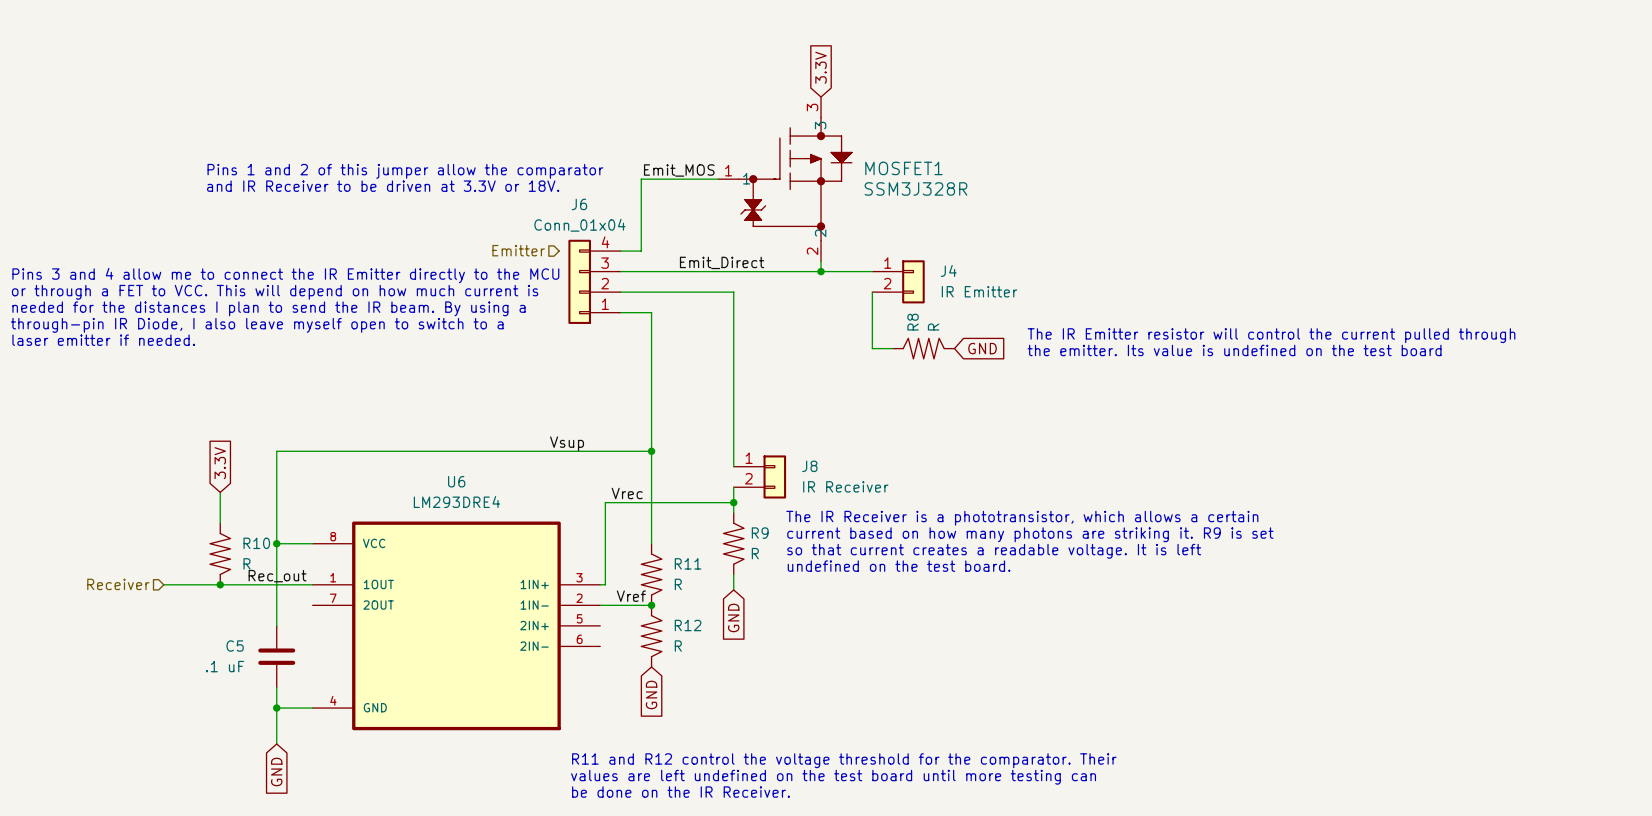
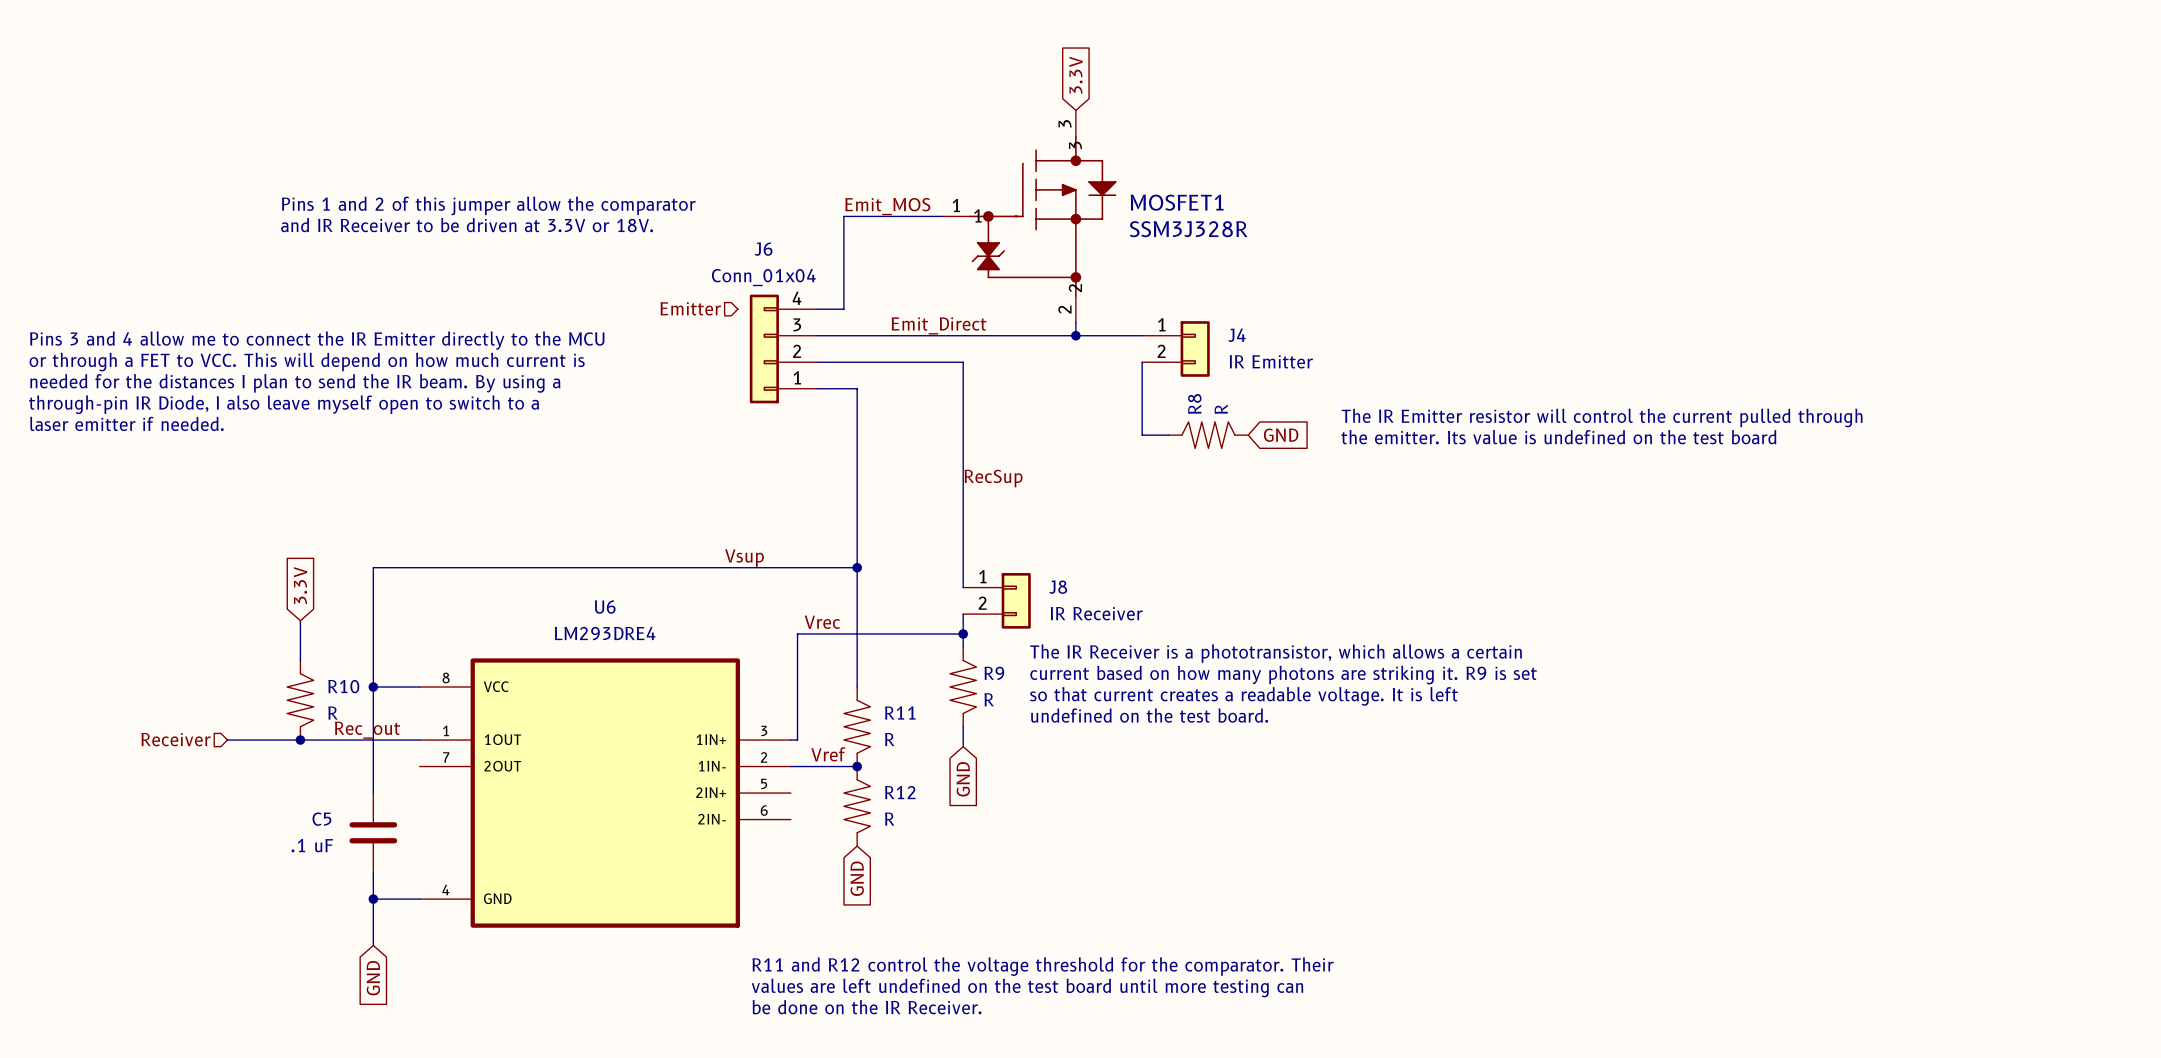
label: none -> RecSup (993, 478)

